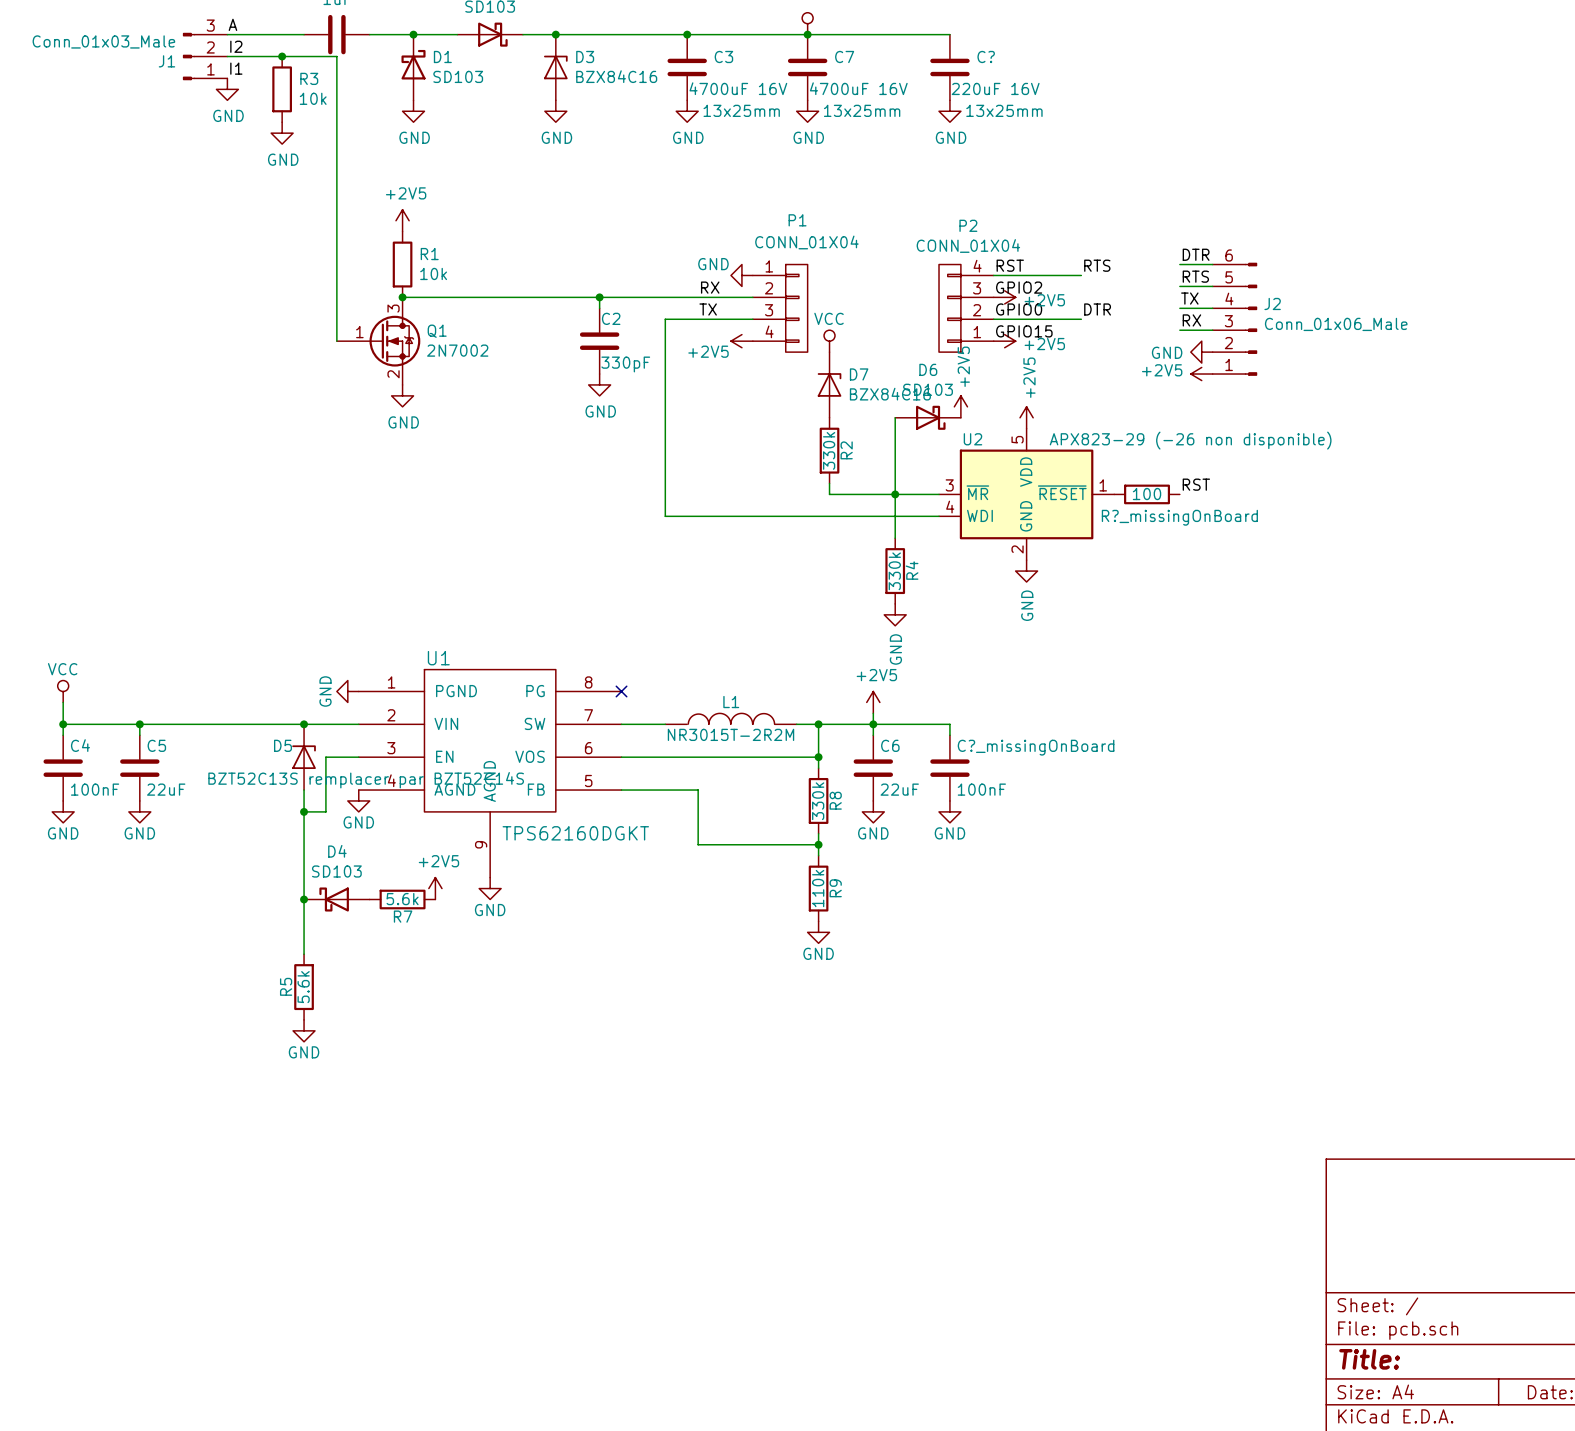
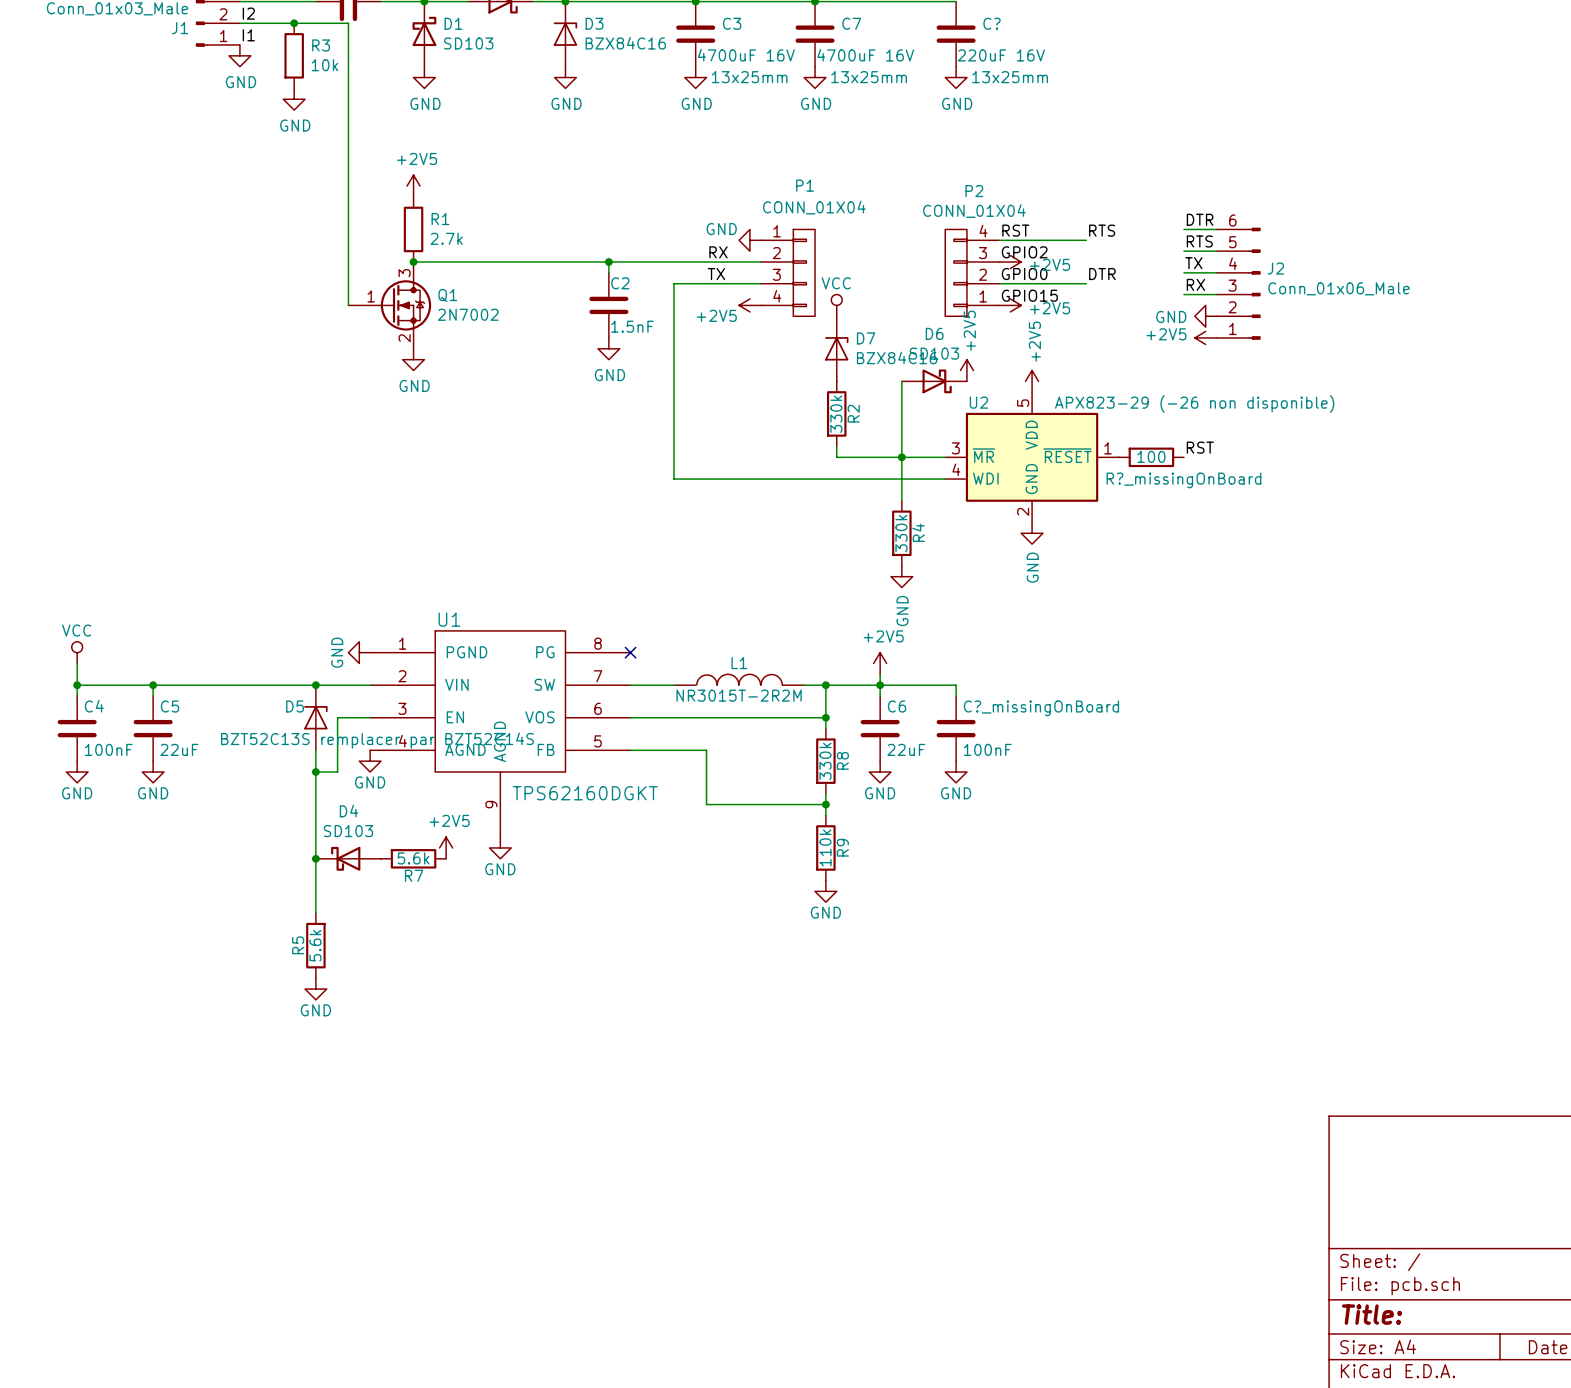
R1 value: 10k (433, 273) -> 2.7k (446, 238)
C2 value: 330pF (625, 364) -> 1.5nF (632, 326)

